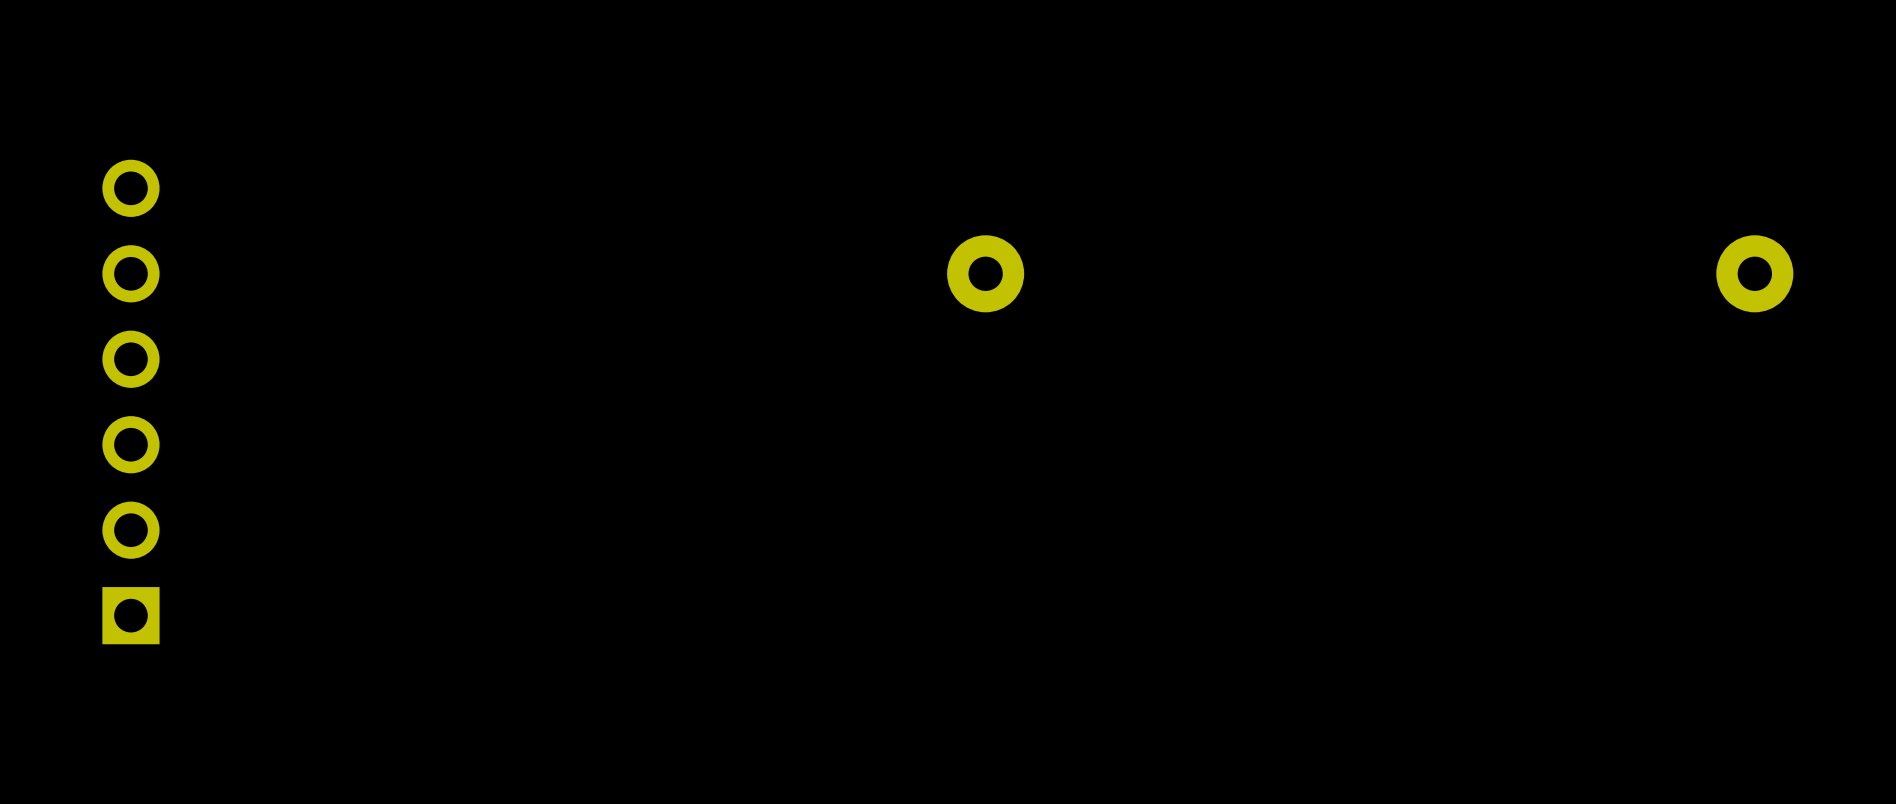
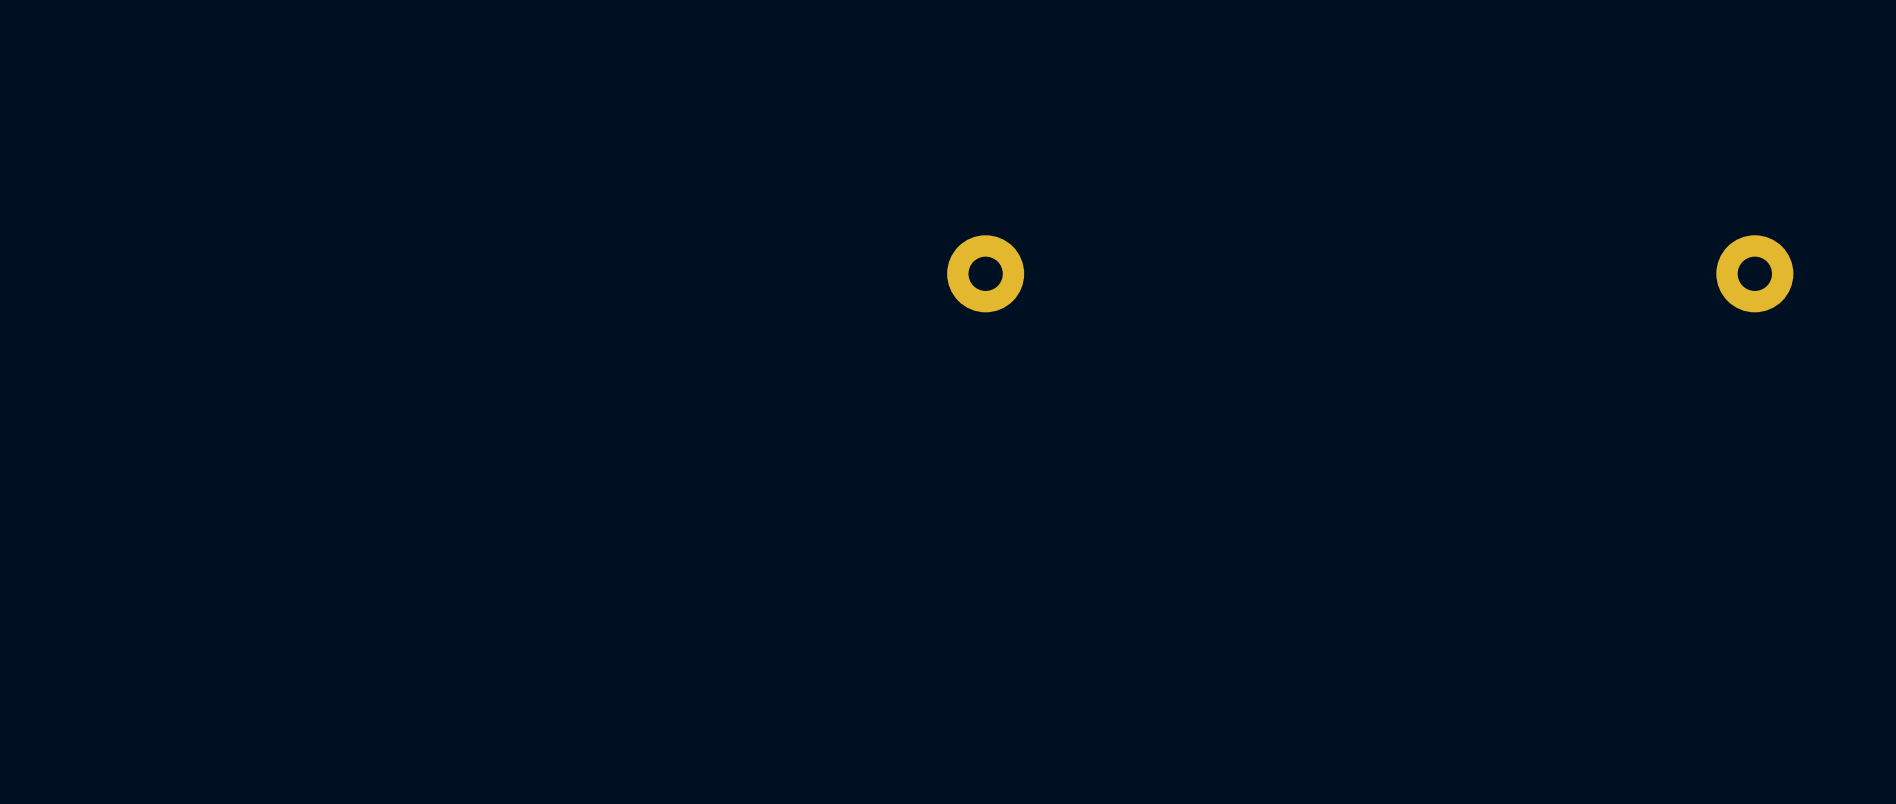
part: (130, 402) -> none

